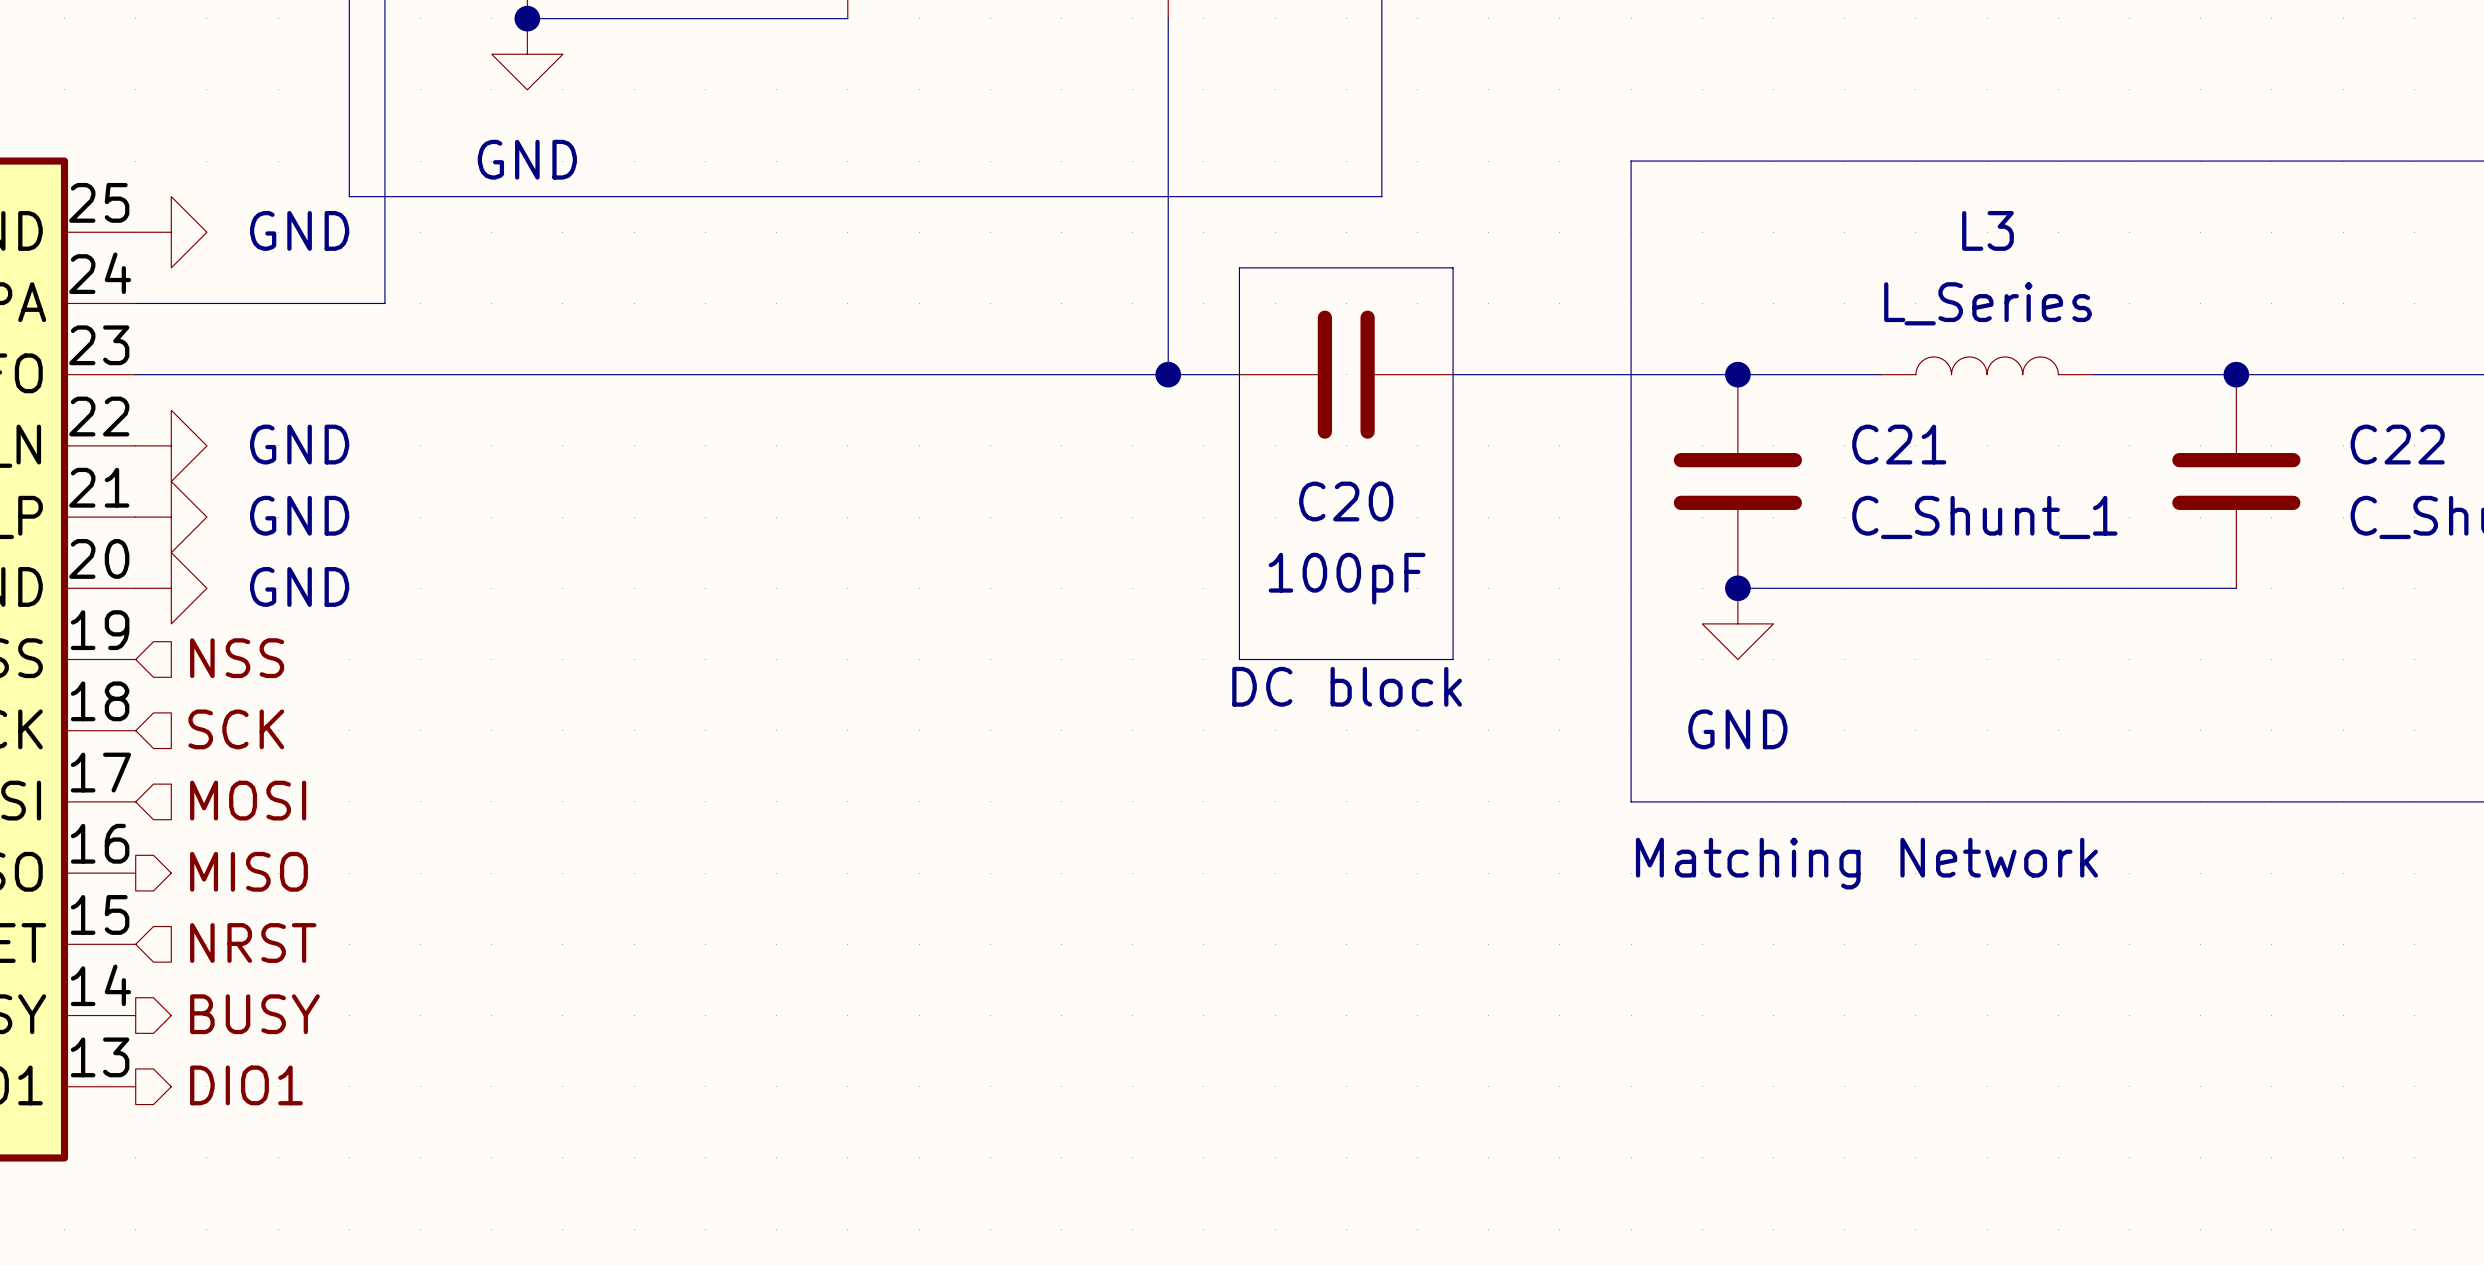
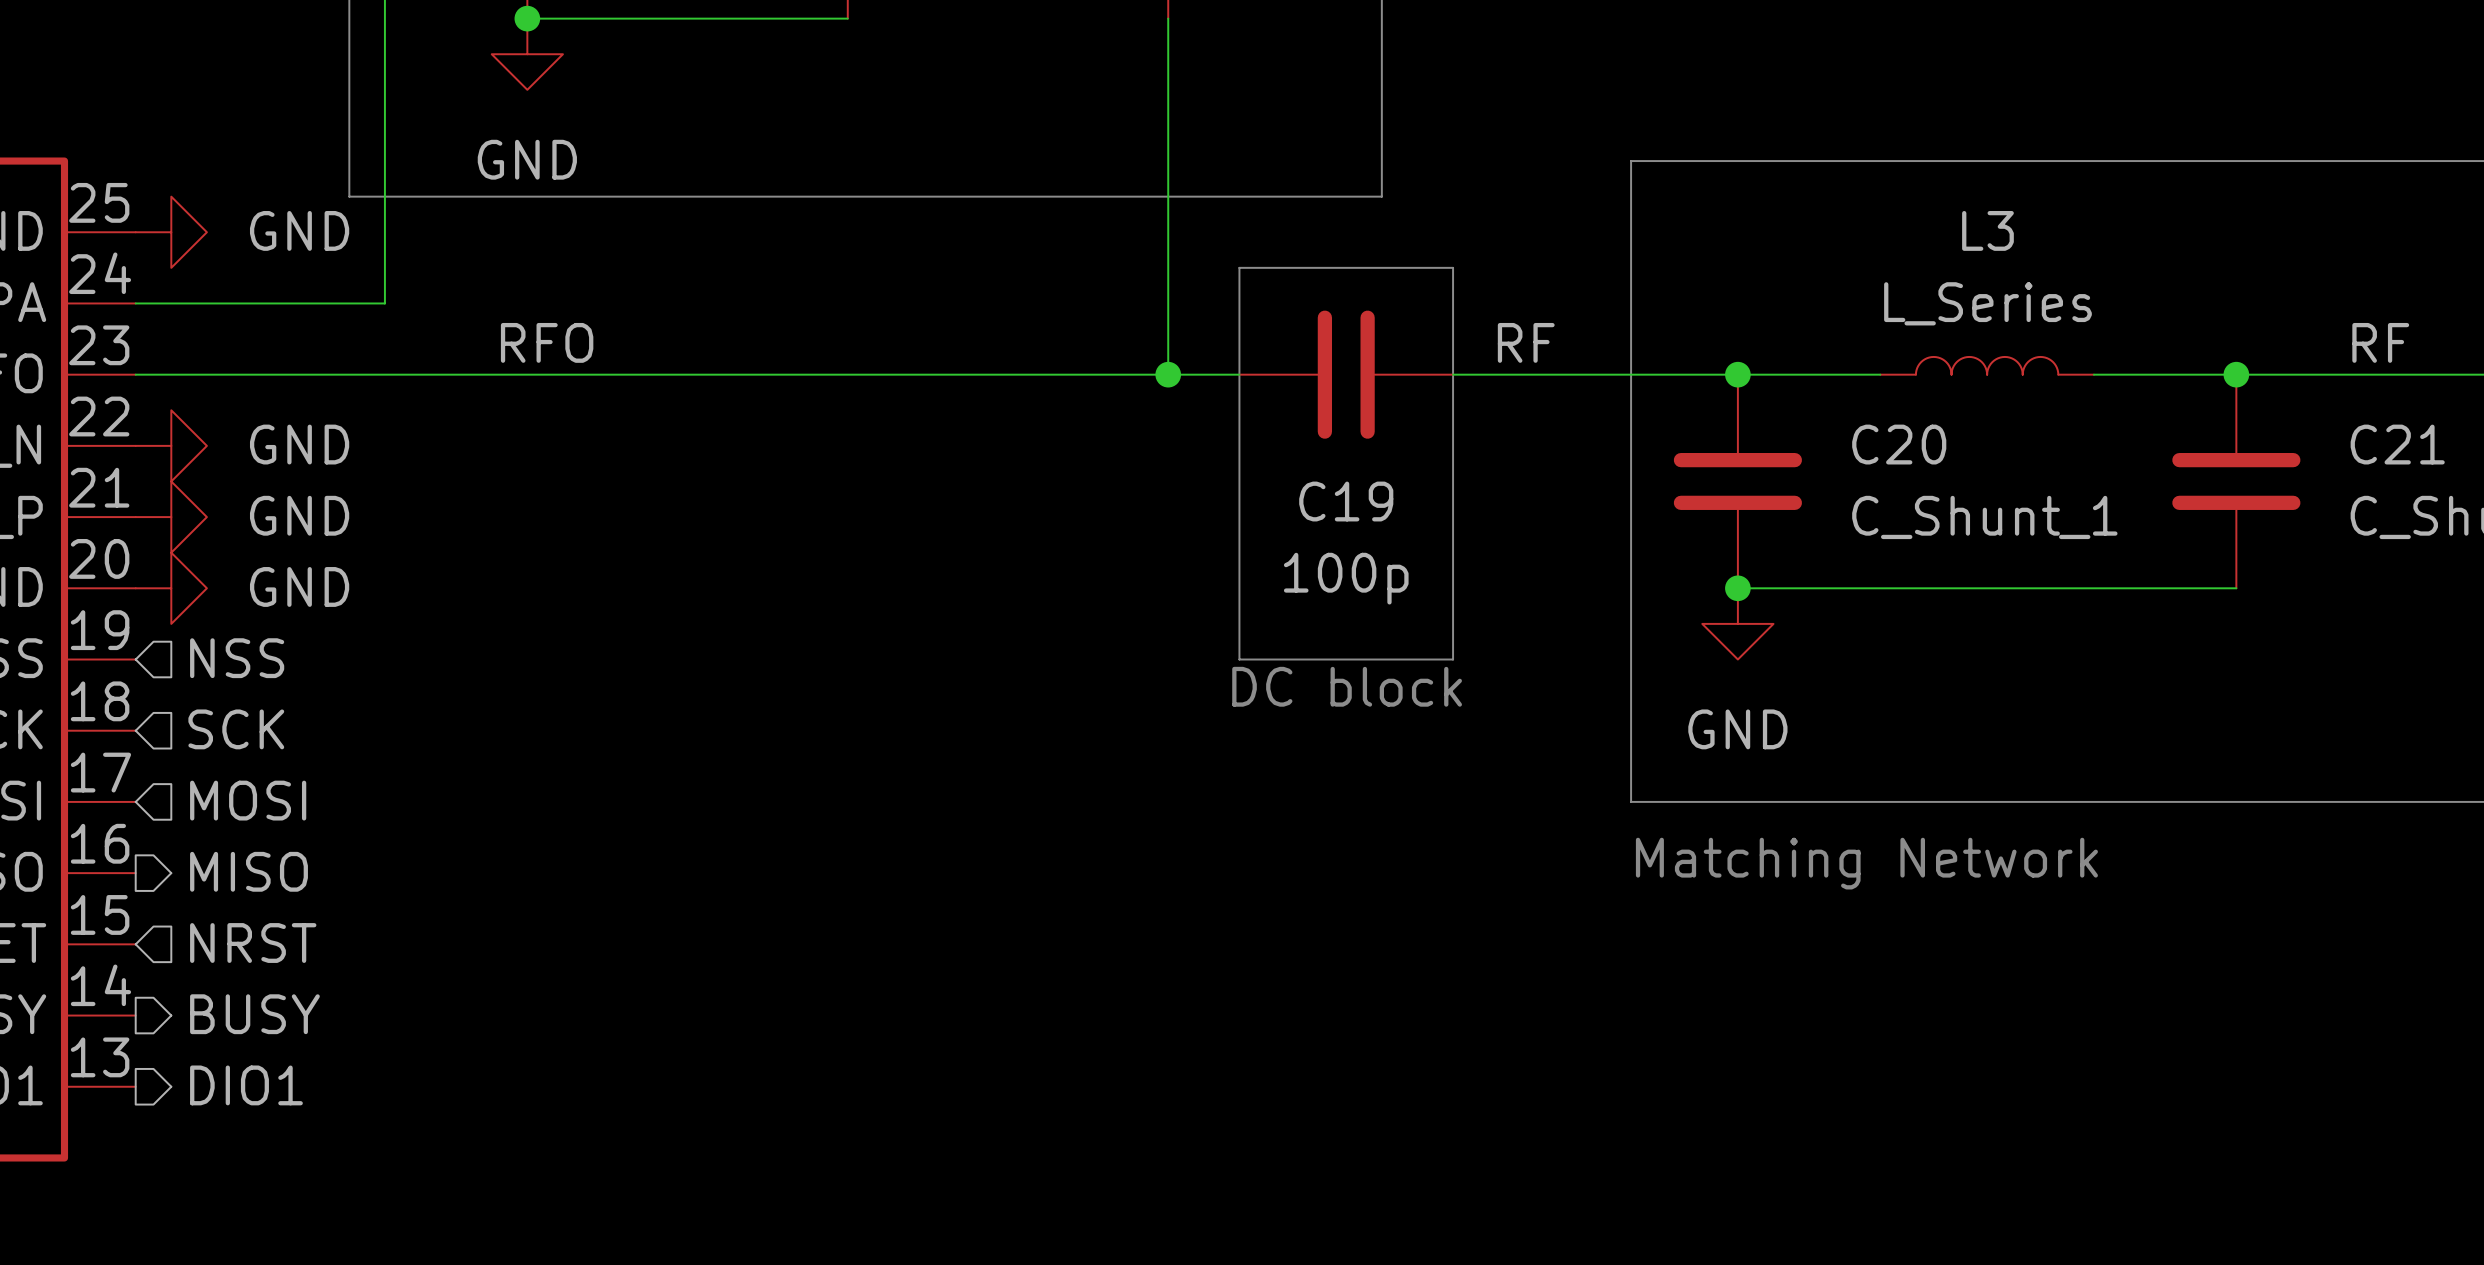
label: none -> RFO (547, 342)
label: none -> RF (1526, 342)
label: none -> RF (2380, 342)
C21 name: C21 (1899, 444) -> C20 (1899, 444)
C22 name: C22 (2397, 444) -> C21 (2397, 444)
C20 name: C20 (1346, 501) -> C19 (1346, 501)
C20 value: 100pF (1347, 578) -> 100p (1346, 578)

